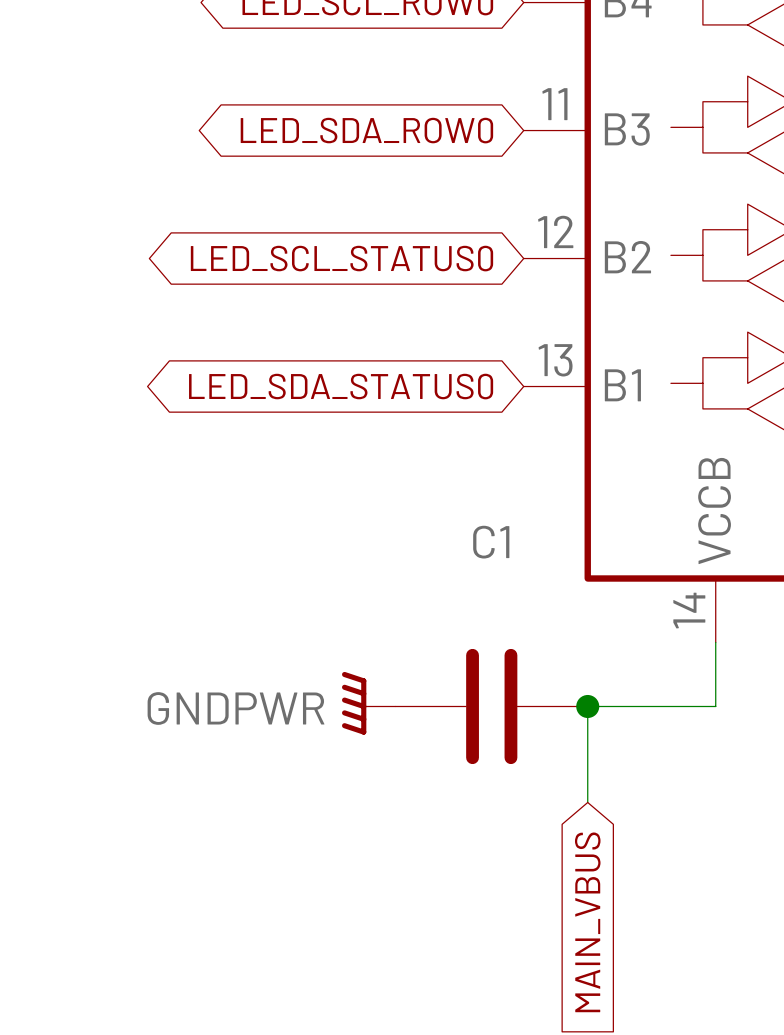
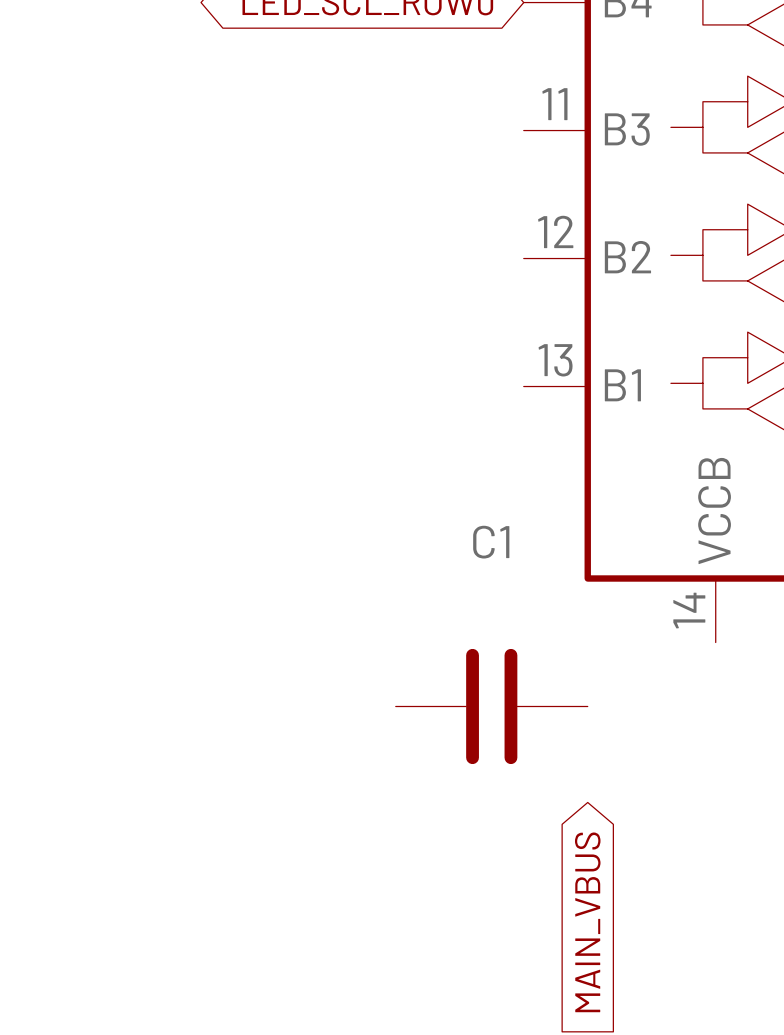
global label: LED_SDA_ROW0 (366, 130) -> none
global label: LED_SCL_STATUS0 (341, 258) -> none
global label: LED_SDA_STATUS0 (341, 386) -> none
wire: (715, 642) (715, 706) (587, 706) (587, 802) -> none
power symbol: GNDPWR (368, 703) -> none
junction: (587, 706) -> none

